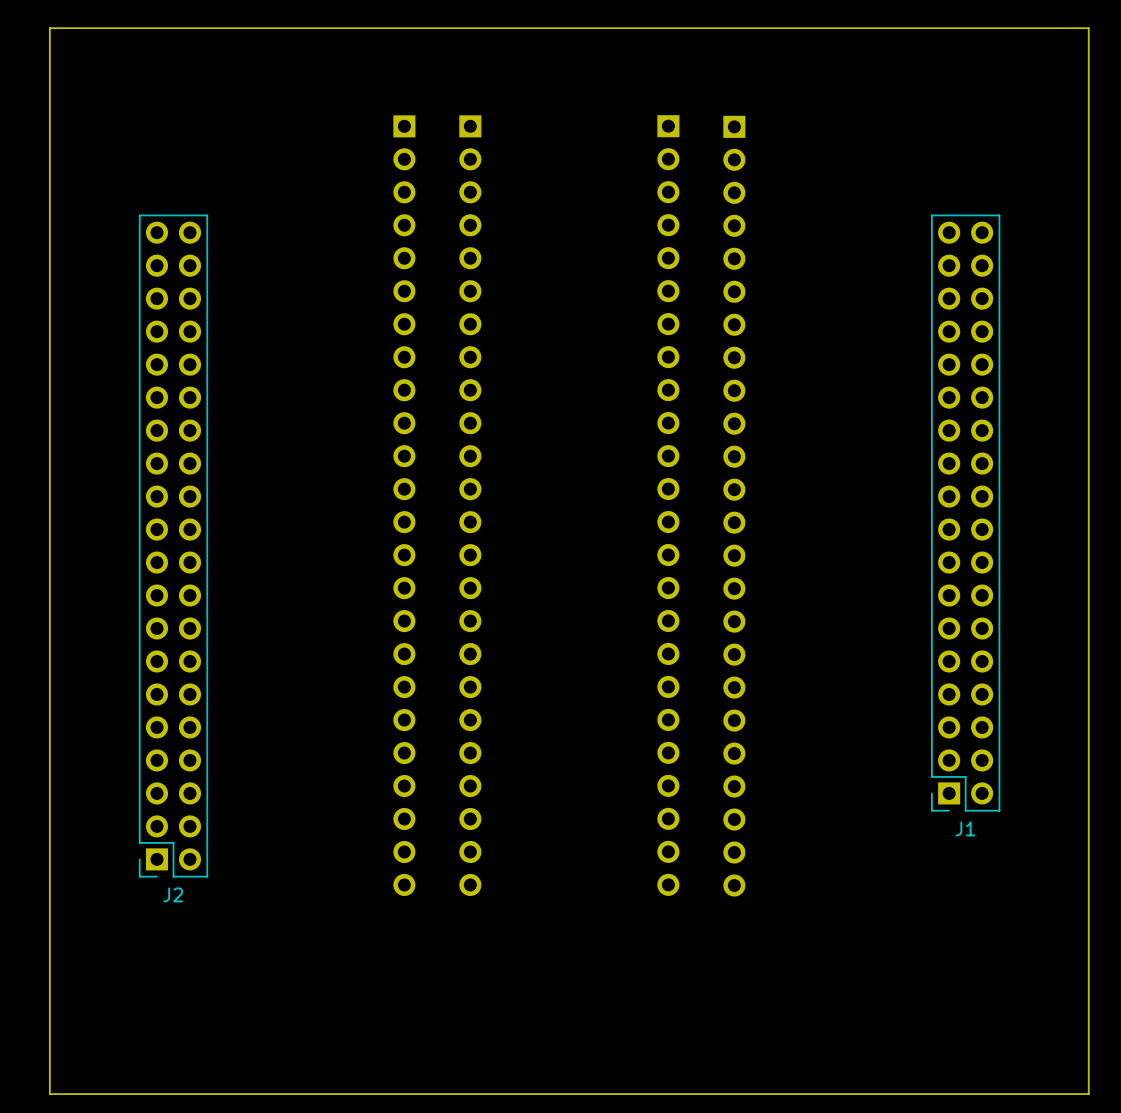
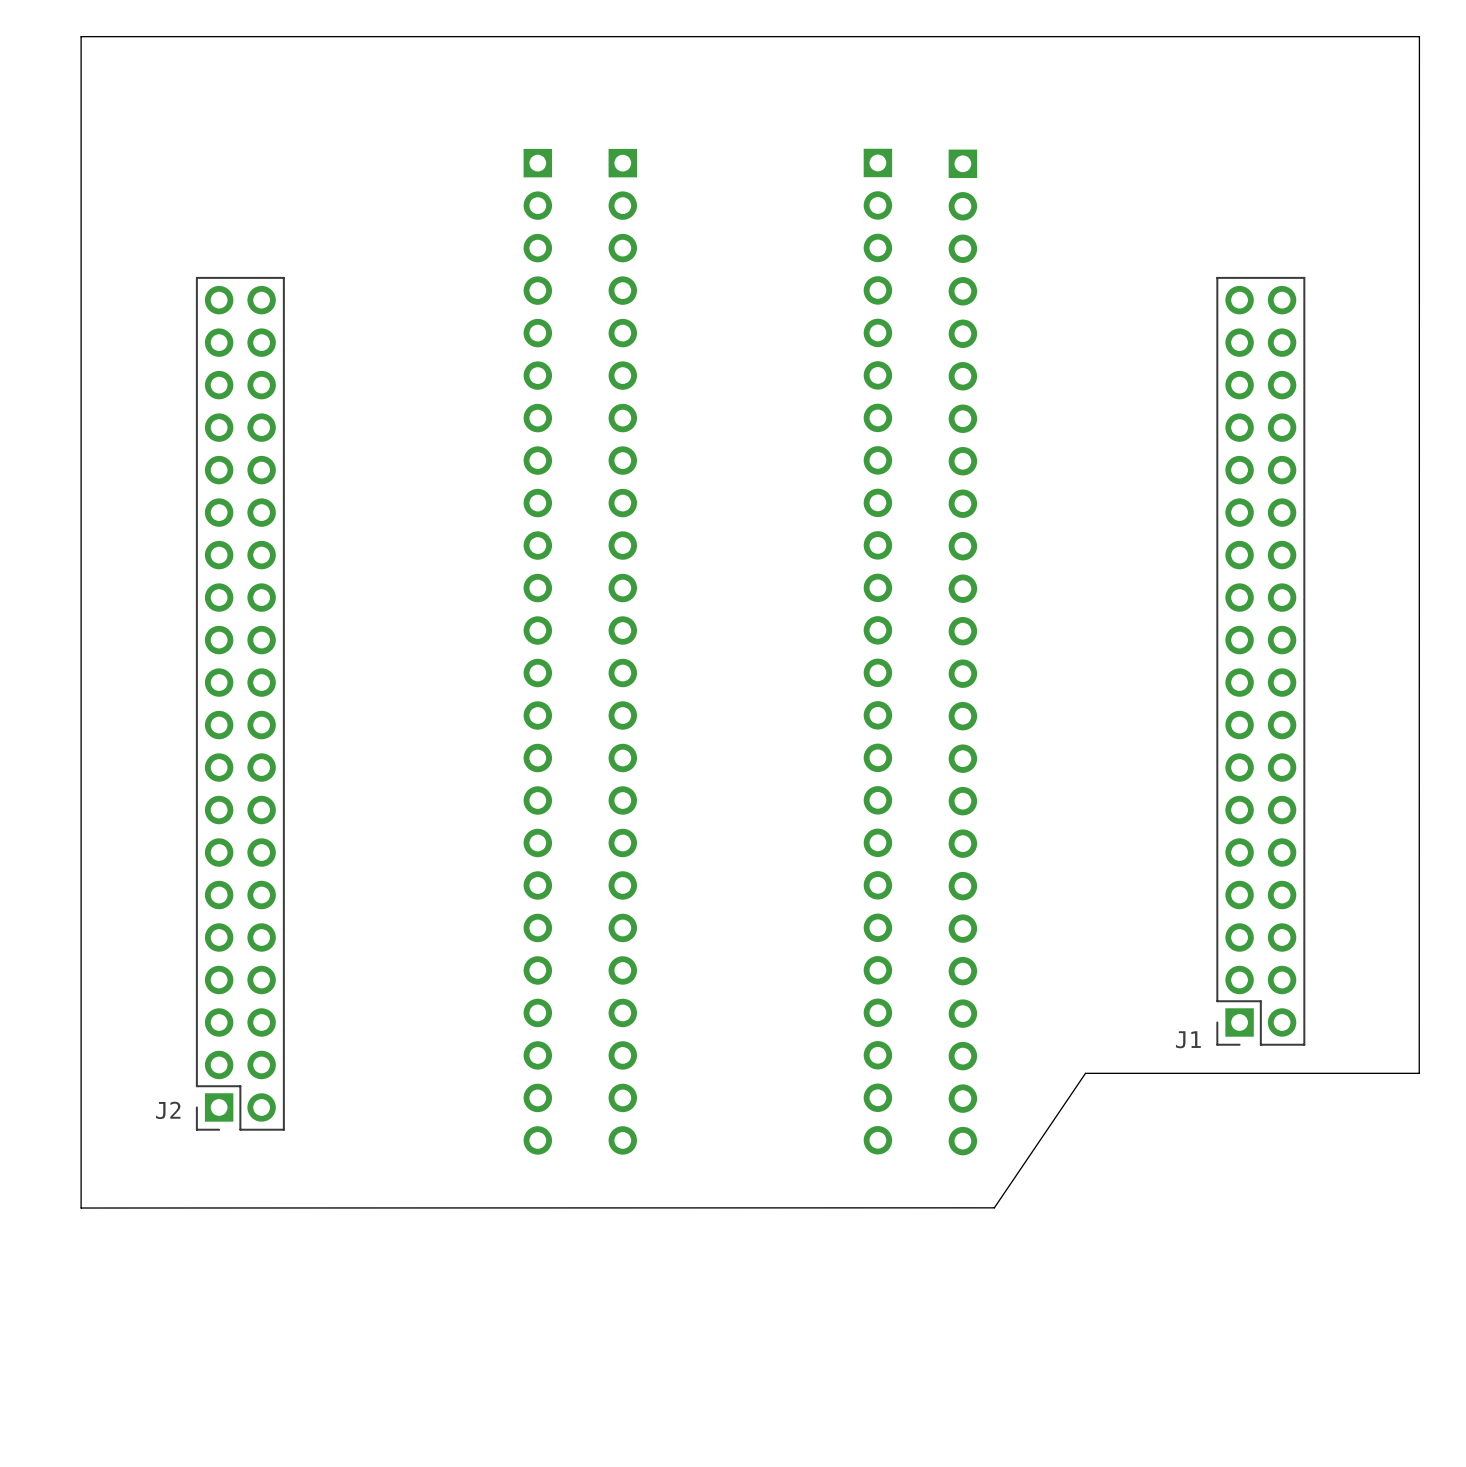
board edge: (1088, 28) (1088, 1094) (49, 1094) (49, 937) -> (1419, 36) (1419, 1073) (1085, 1073) (994, 1207) (81, 1208)
J1 name position: J1 (965, 828) -> J1 (1188, 1039)
J2 name position: J2 (173, 894) -> J2 (168, 1110)

